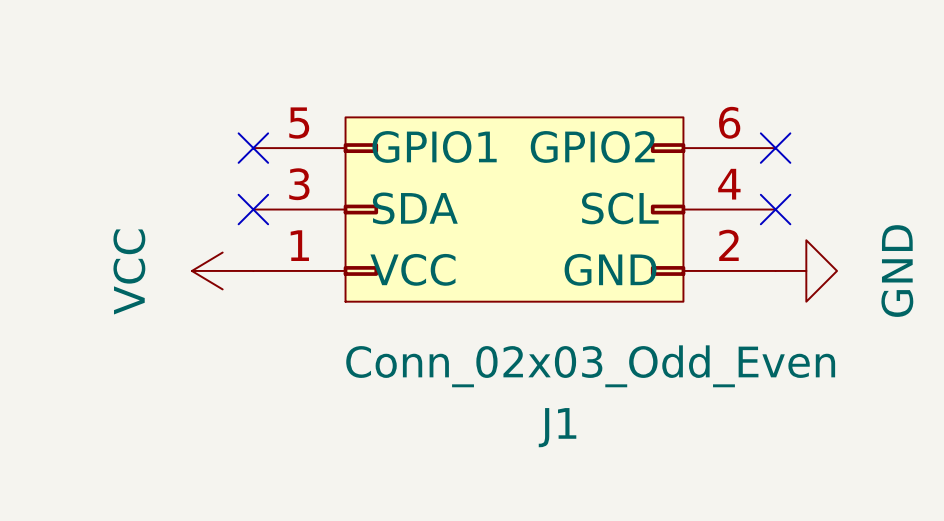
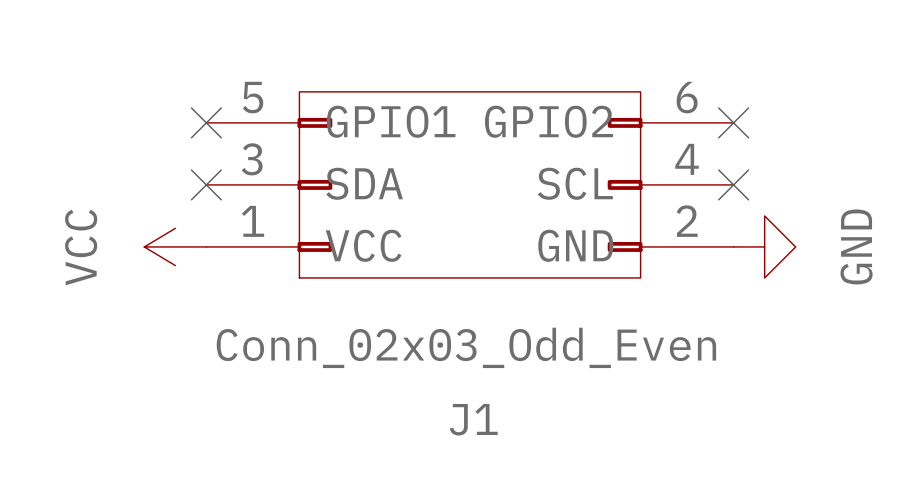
J1 value position: Conn_02x03_Odd_Even (590, 366) -> Conn_02x03_Odd_Even (466, 347)
J1 name position: J1 (557, 427) -> J1 (473, 419)

